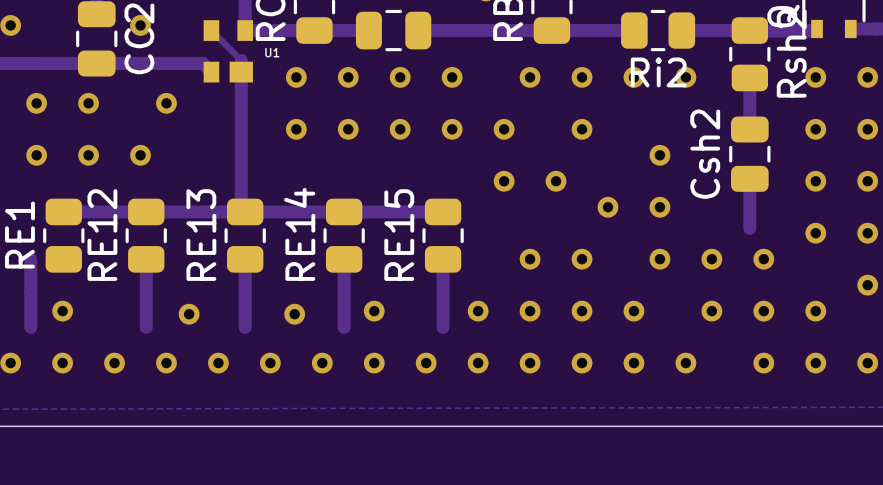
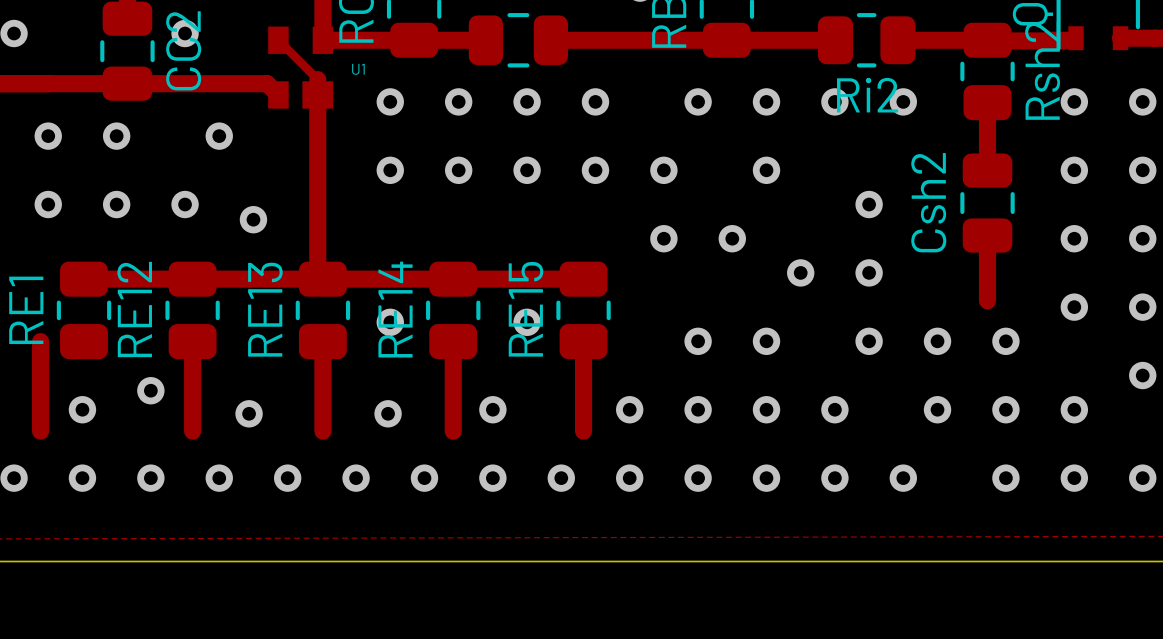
via: none -> (253, 219)
via: none -> (390, 322)
via: none -> (527, 322)
via: none -> (150, 390)

